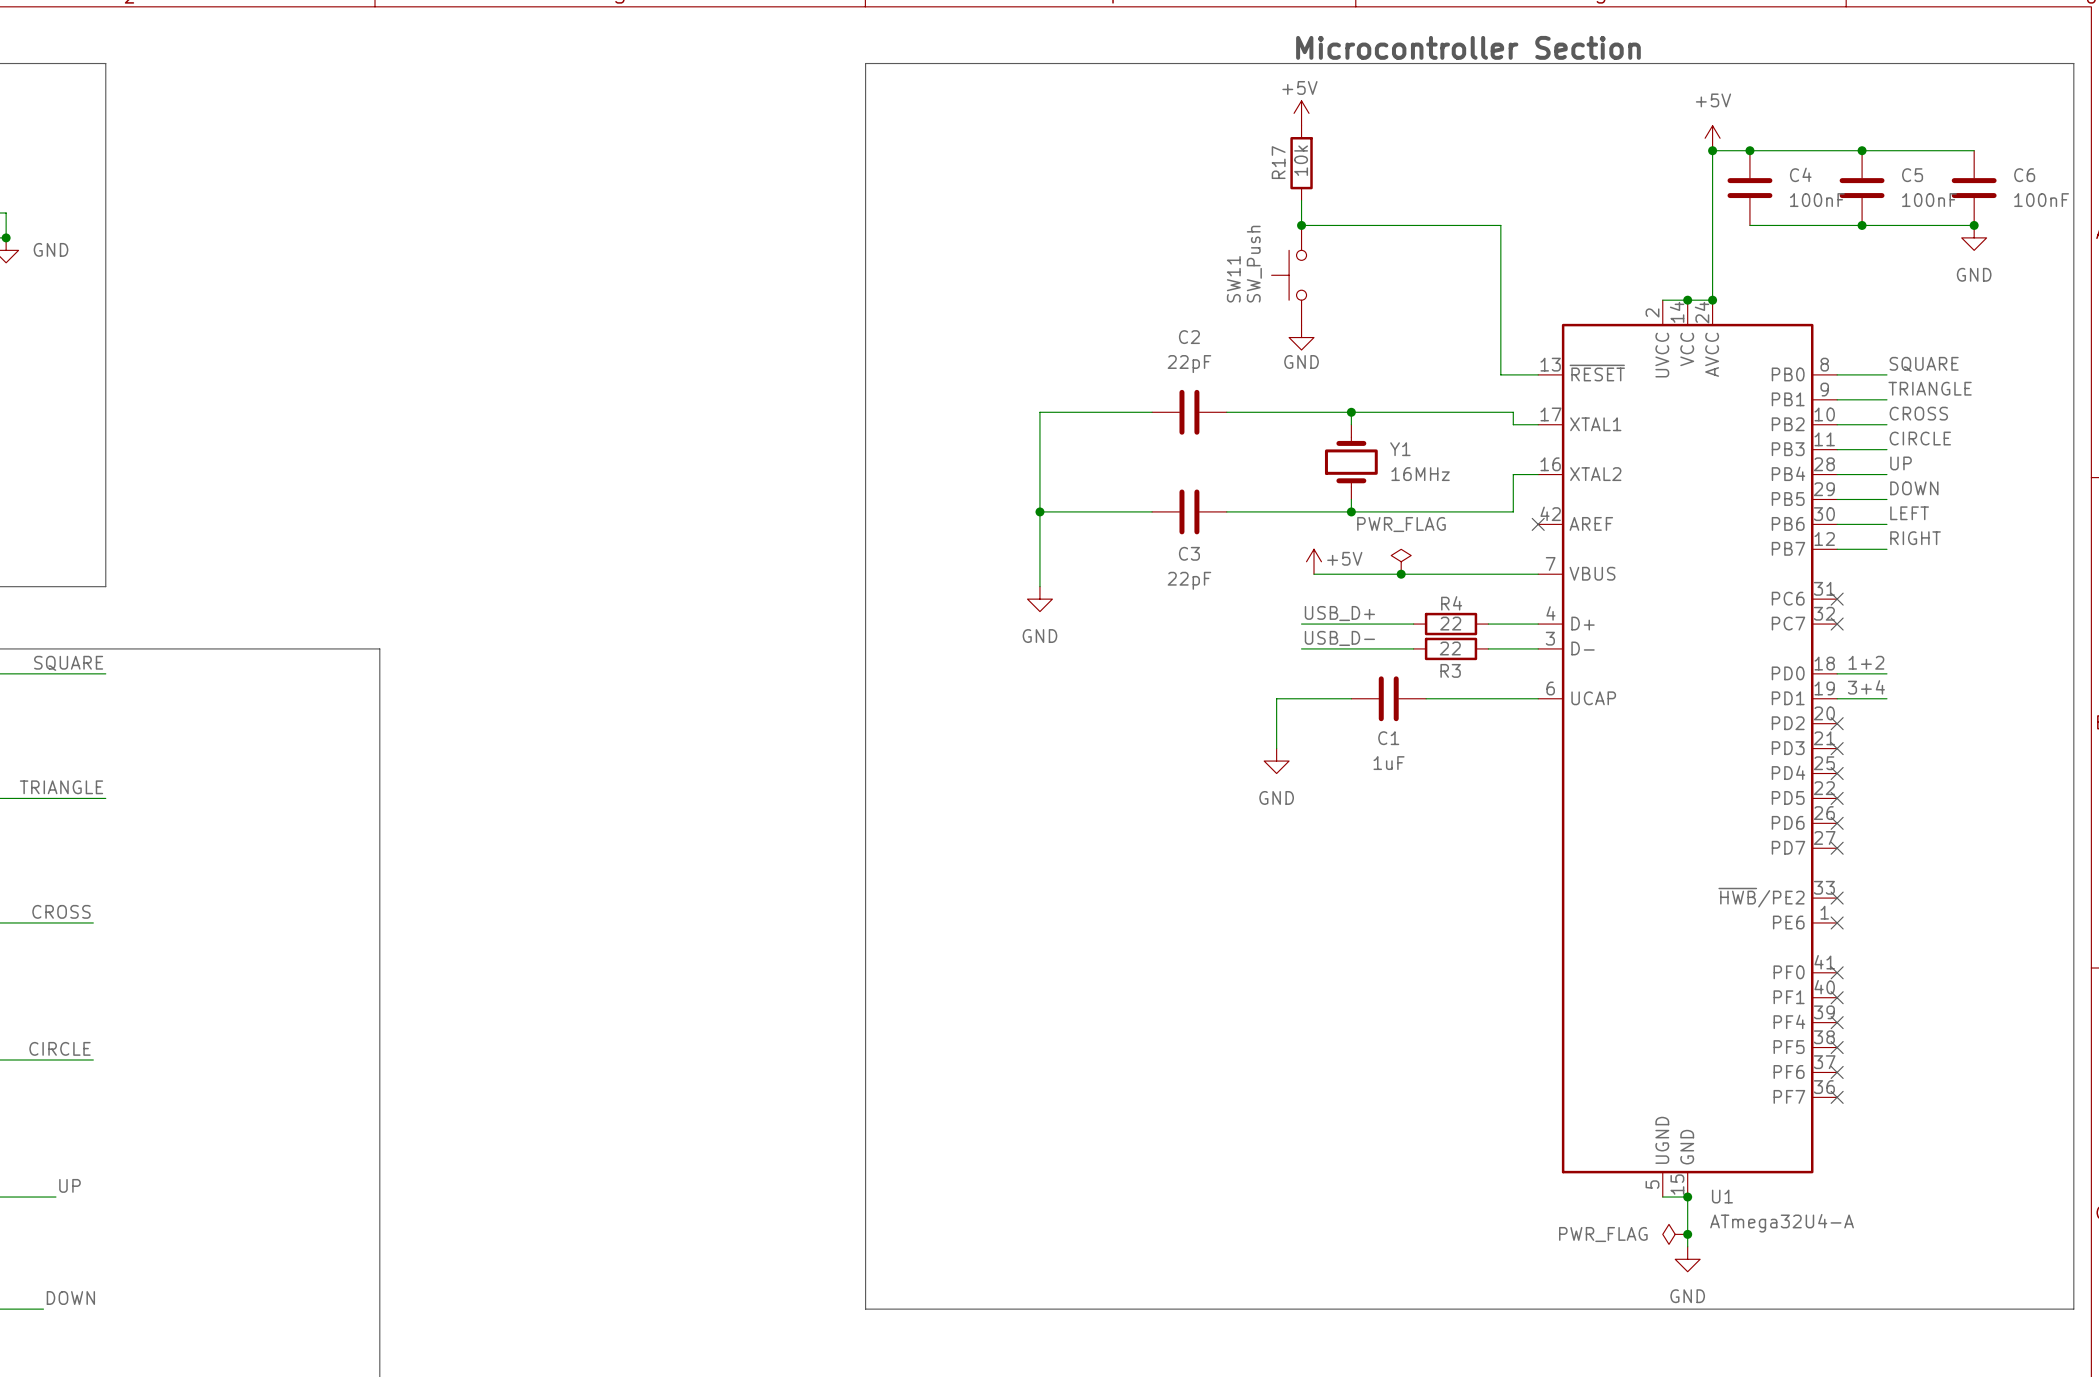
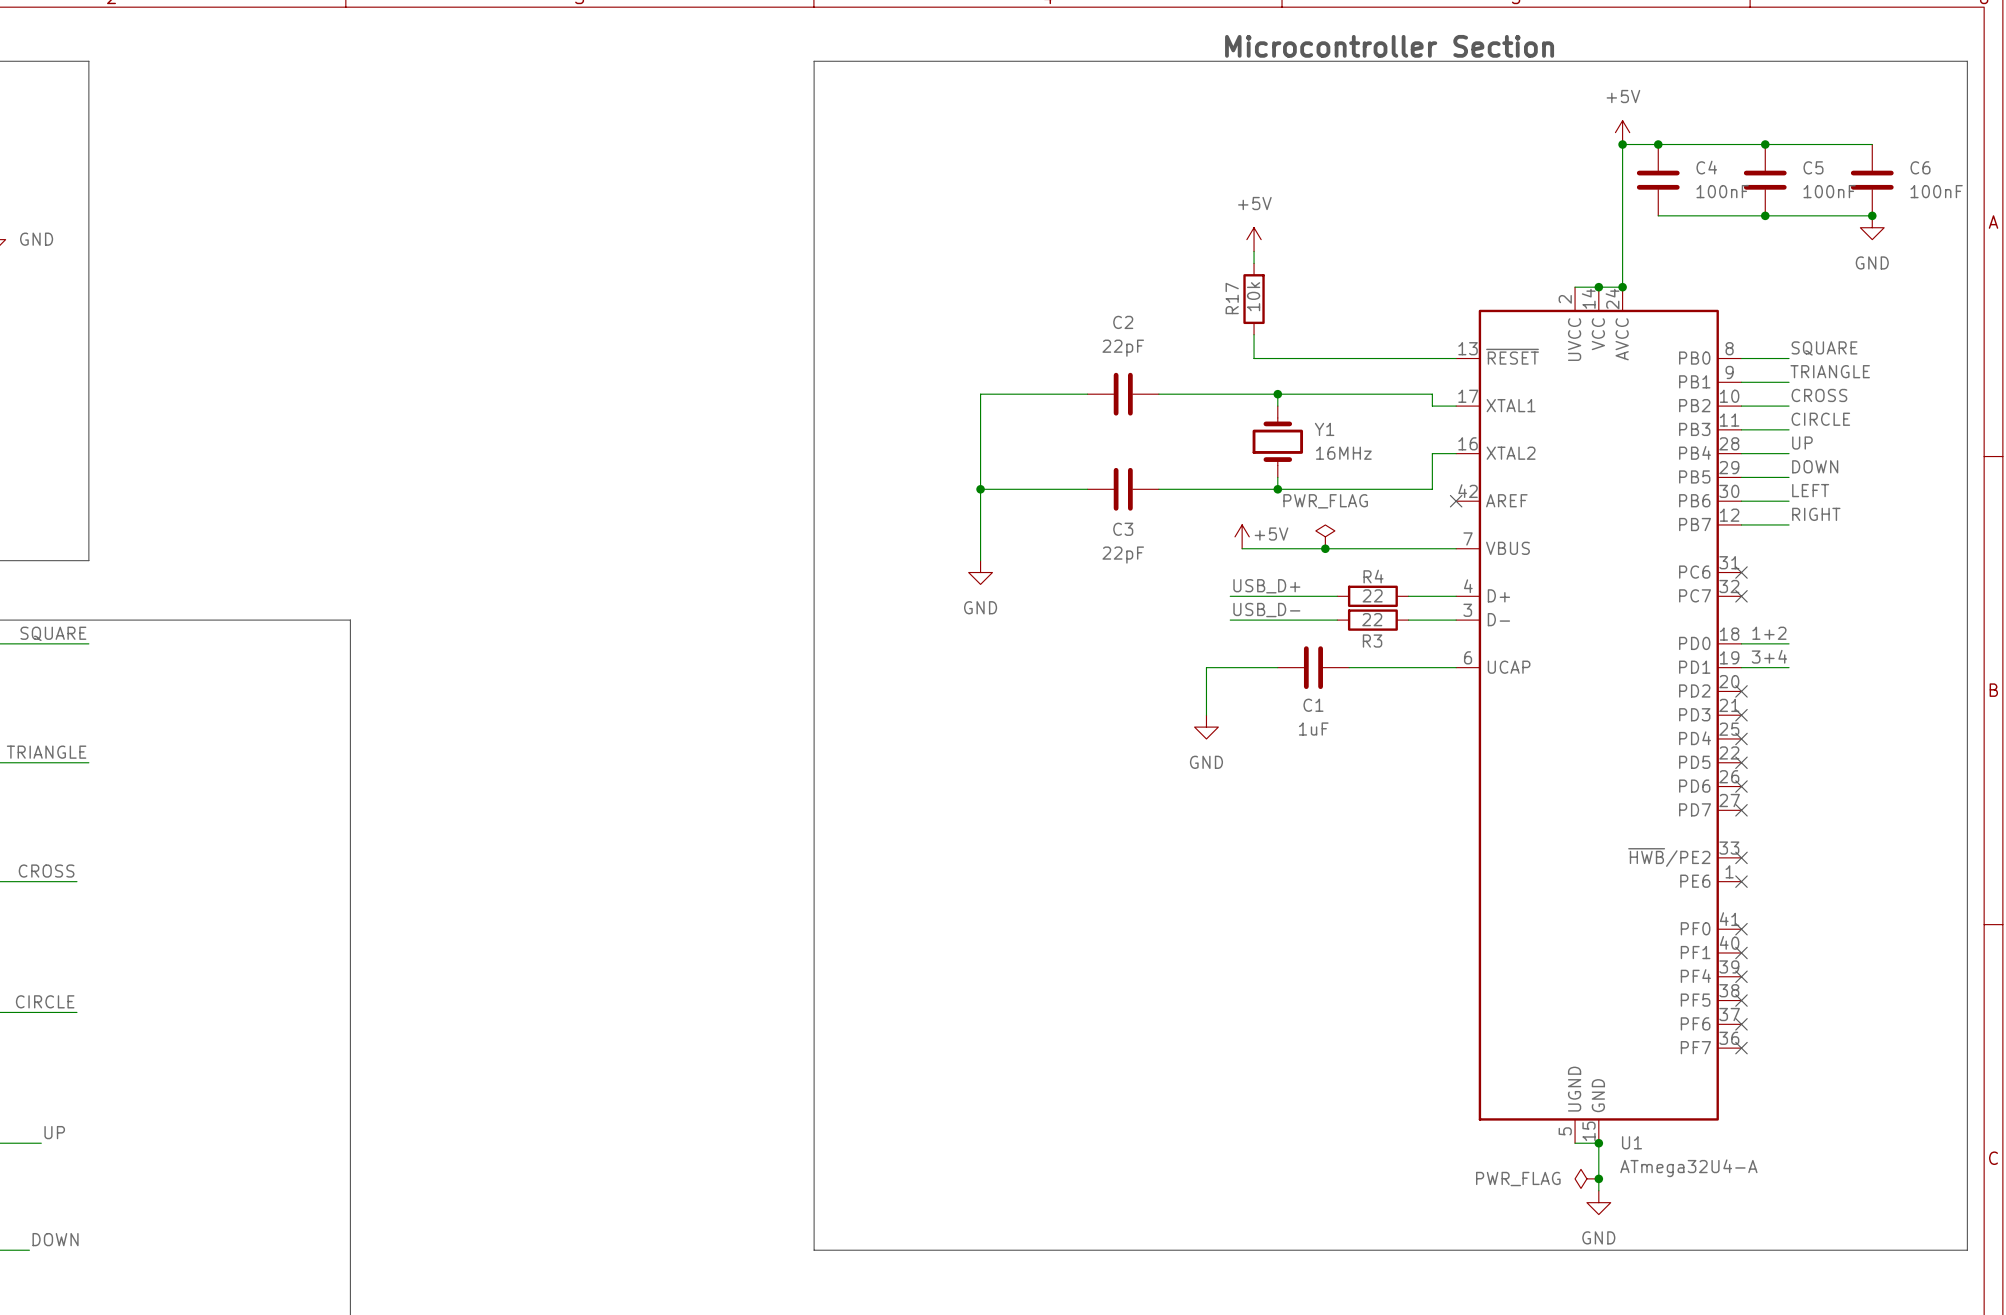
power symbol text position: +5V (1299, 87) -> +5V (1254, 203)
power symbol position: +5V (1301, 113) -> +5V (1254, 239)
R17 position: (1301, 163) -> (1254, 299)
wire: (1301, 200) (1301, 225) (1500, 225) (1500, 374) -> (1254, 334) (1254, 358) (1420, 358)
junction: (1301, 225) -> none
wire: none -> (1254, 251) (1254, 263)
SW11: SW_Push (1289, 275) -> none
power symbol: GND (1301, 337) -> none

